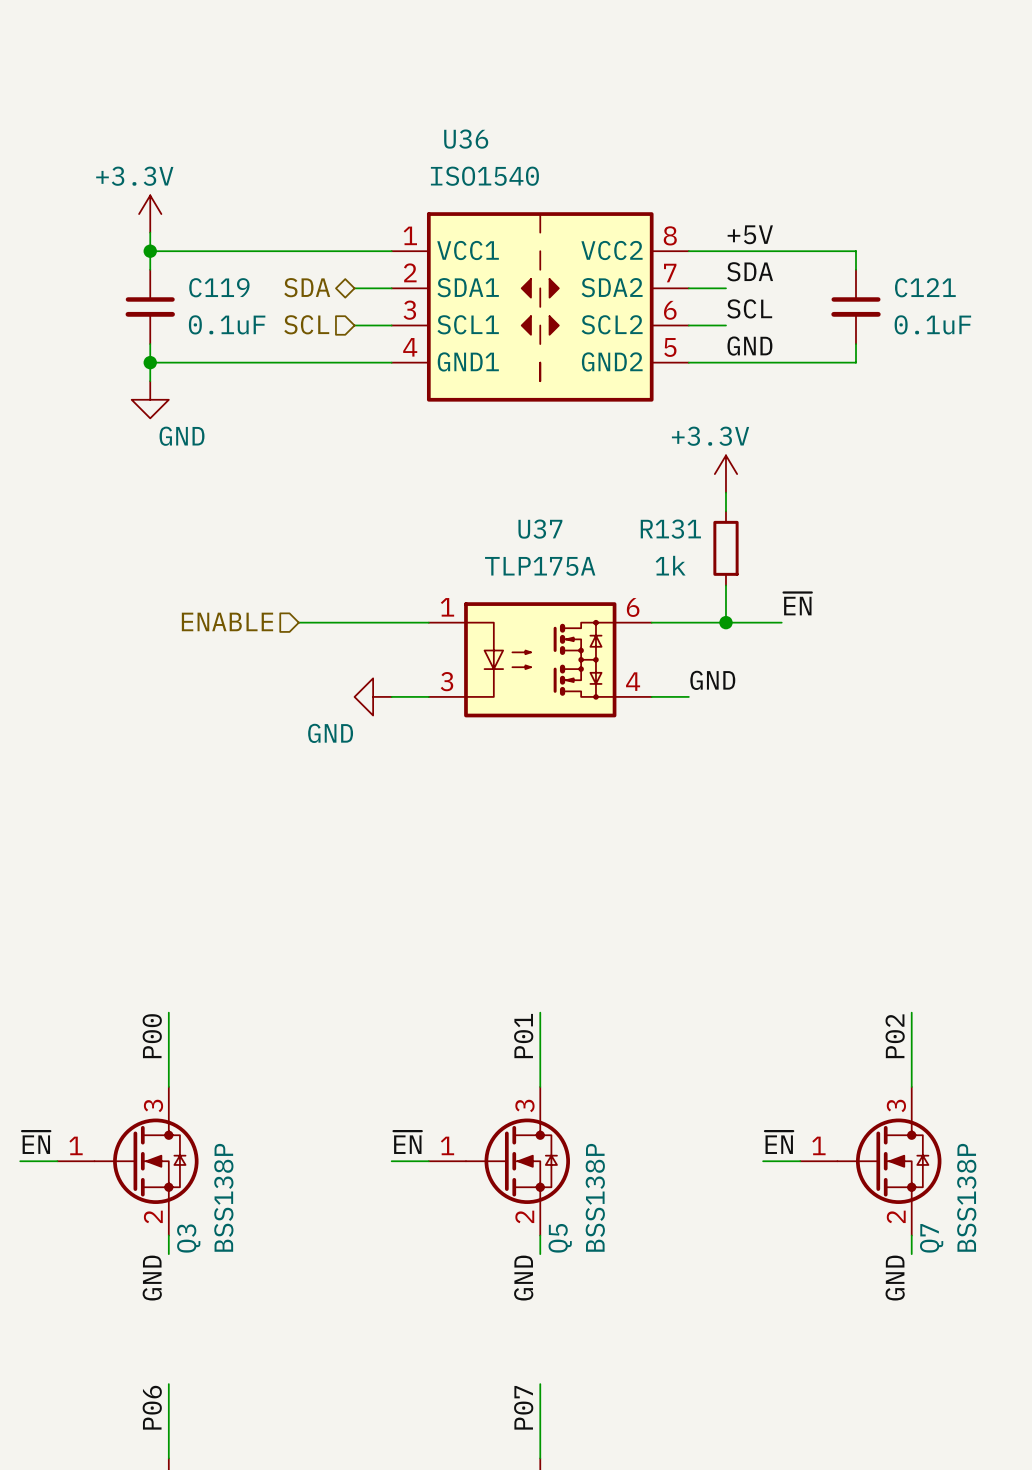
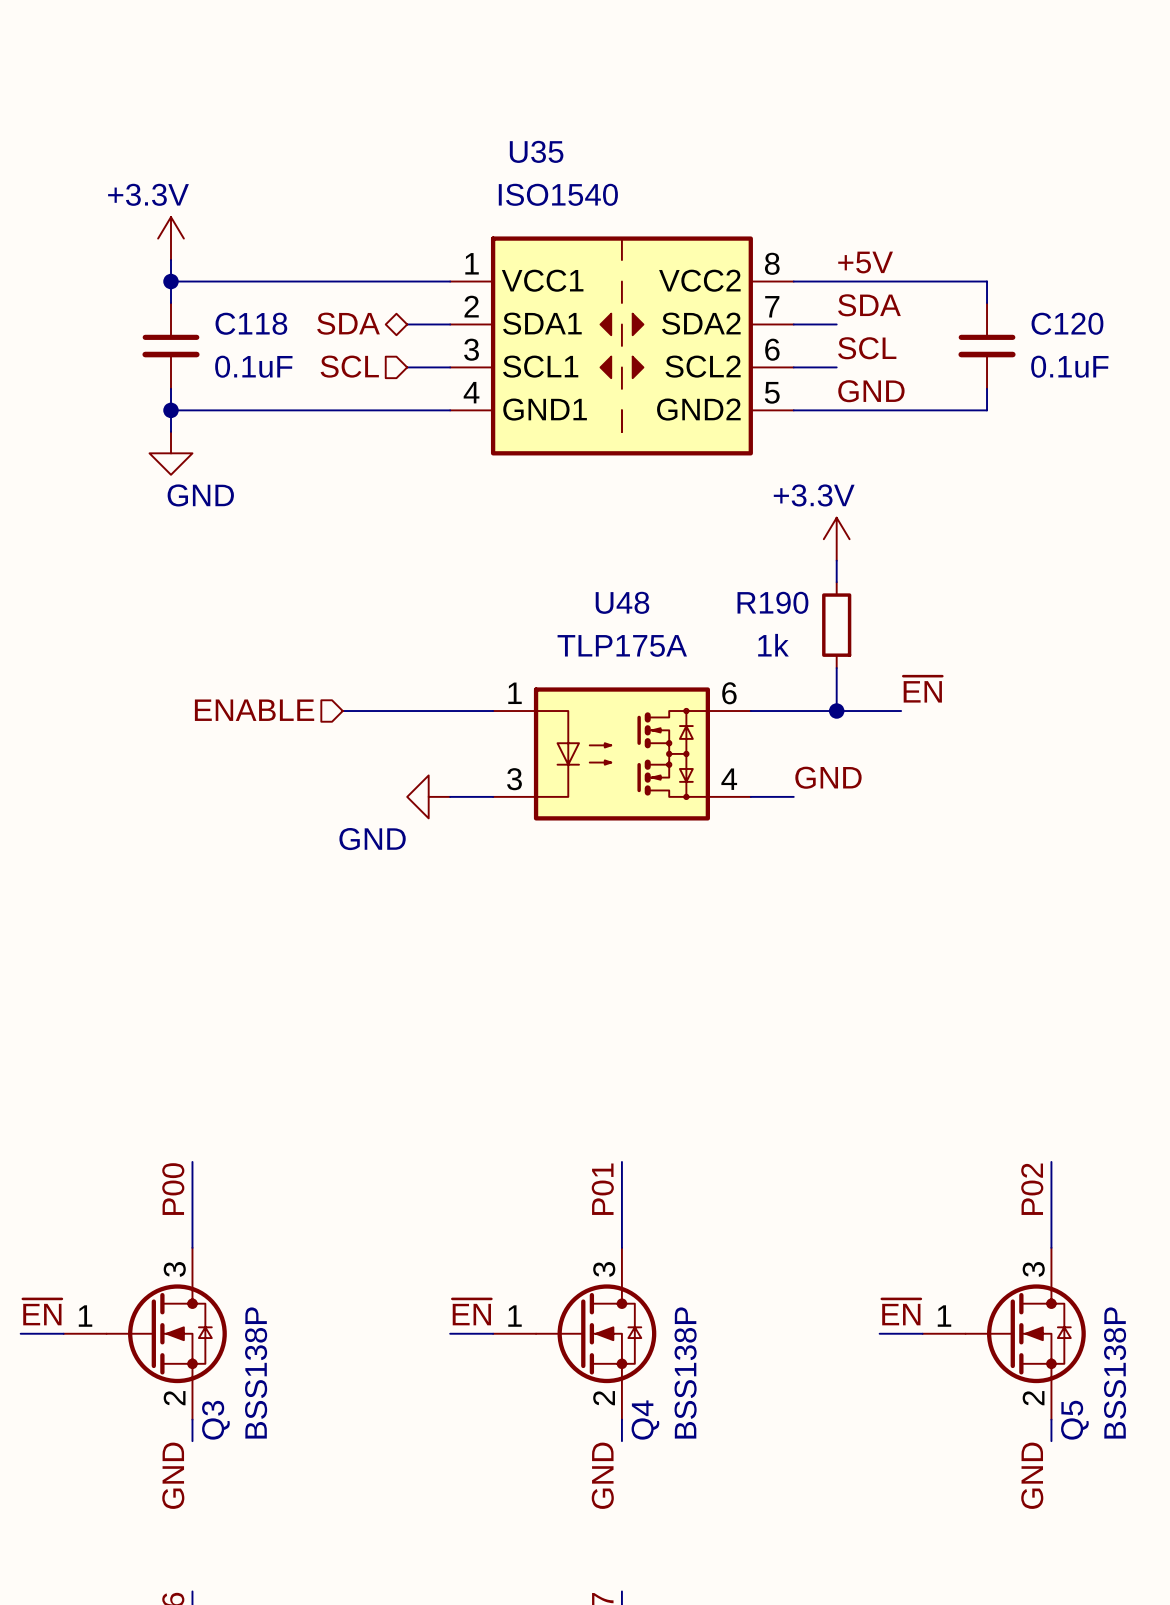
U36 name: U36 (466, 139) -> U35 (536, 151)
C119 name: C119 (219, 287) -> C118 (251, 323)
C121 name: C121 (925, 287) -> C120 (1067, 323)
U37 name: U37 (540, 529) -> U48 (622, 602)
R131 name: R131 (670, 529) -> R190 (772, 602)
Q5 name: Q5 (560, 1238) -> Q4 (645, 1420)
Q7 name: Q7 (931, 1238) -> Q5 (1074, 1420)

